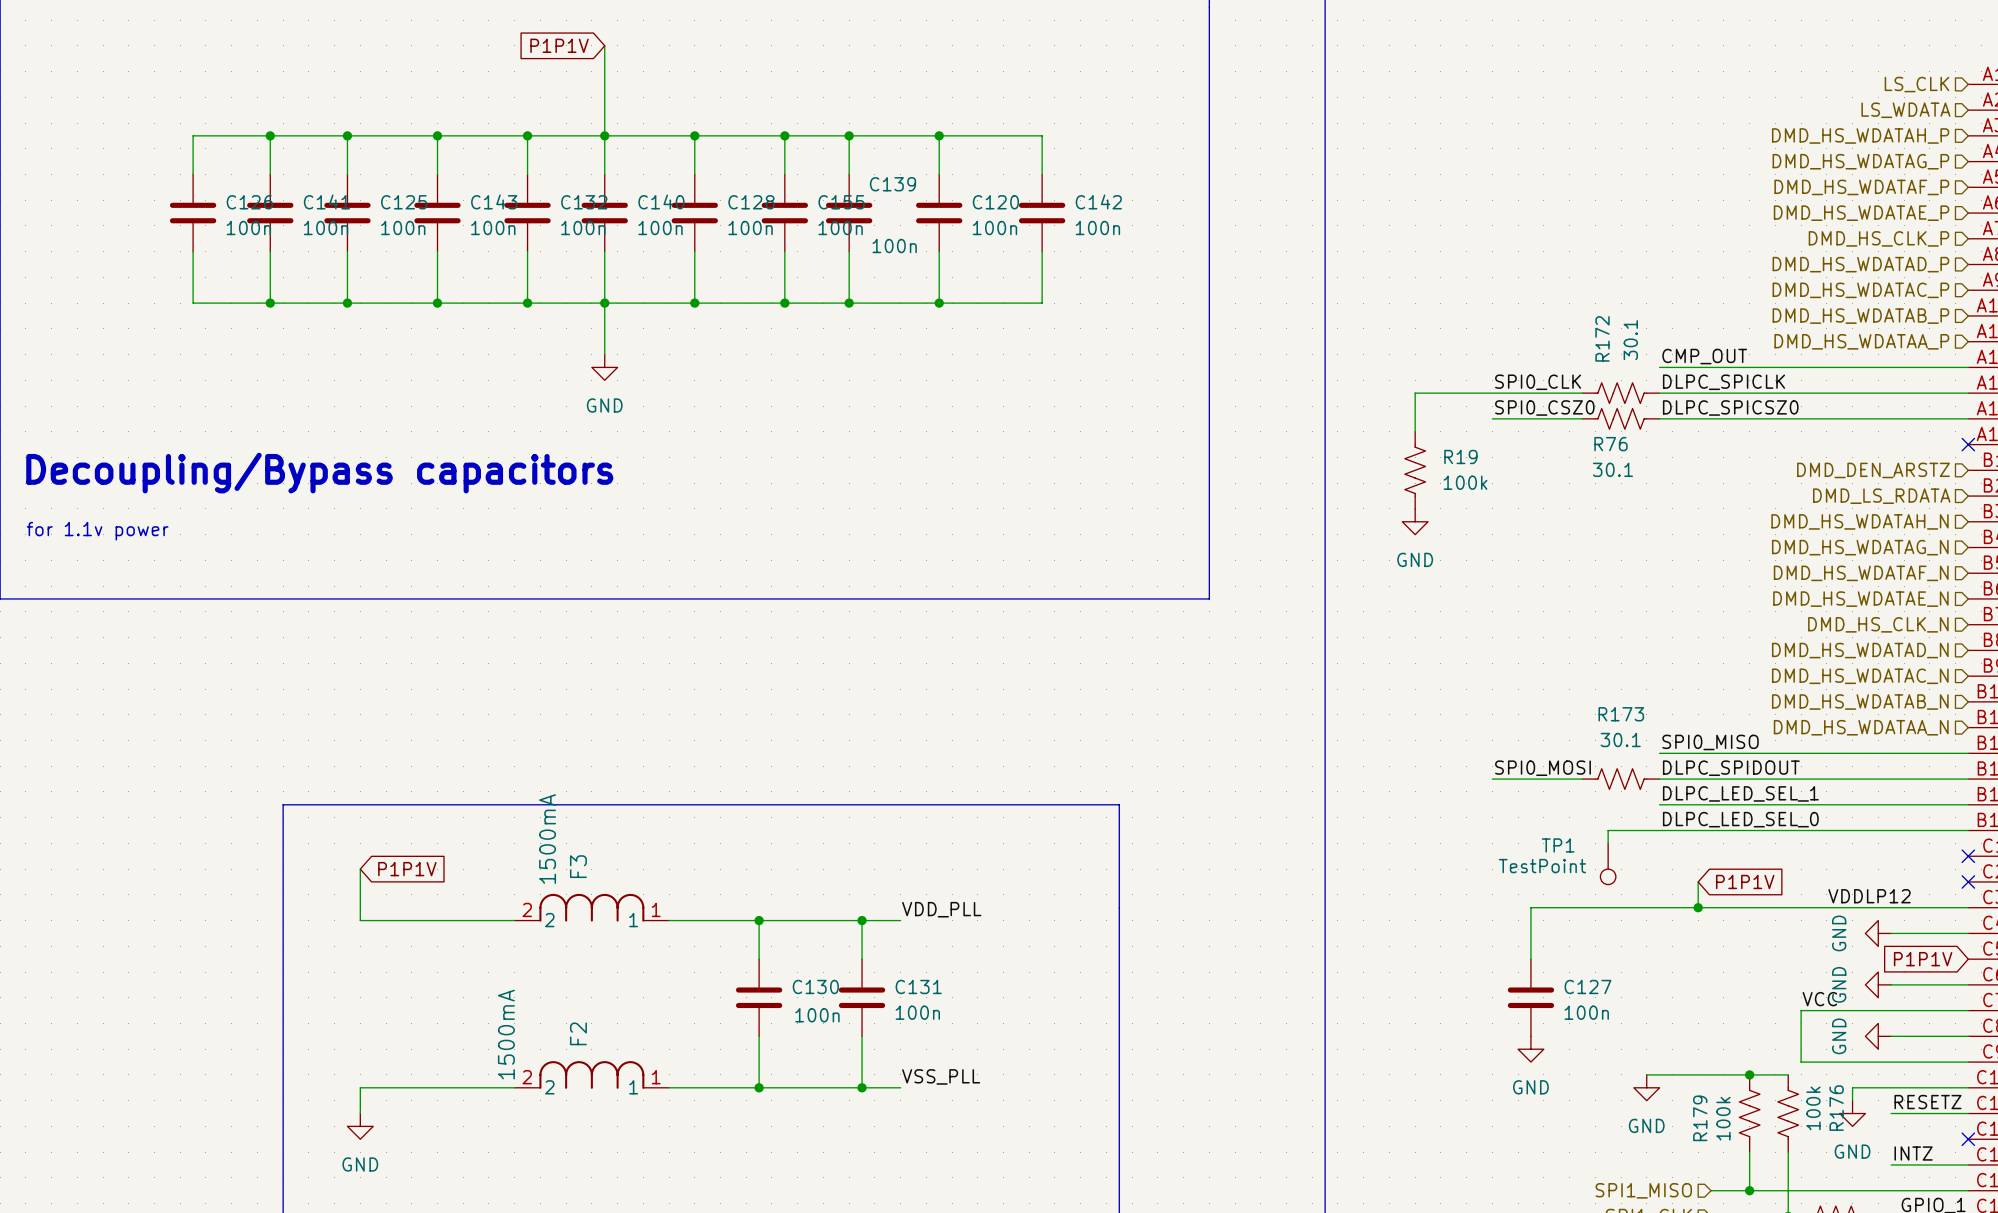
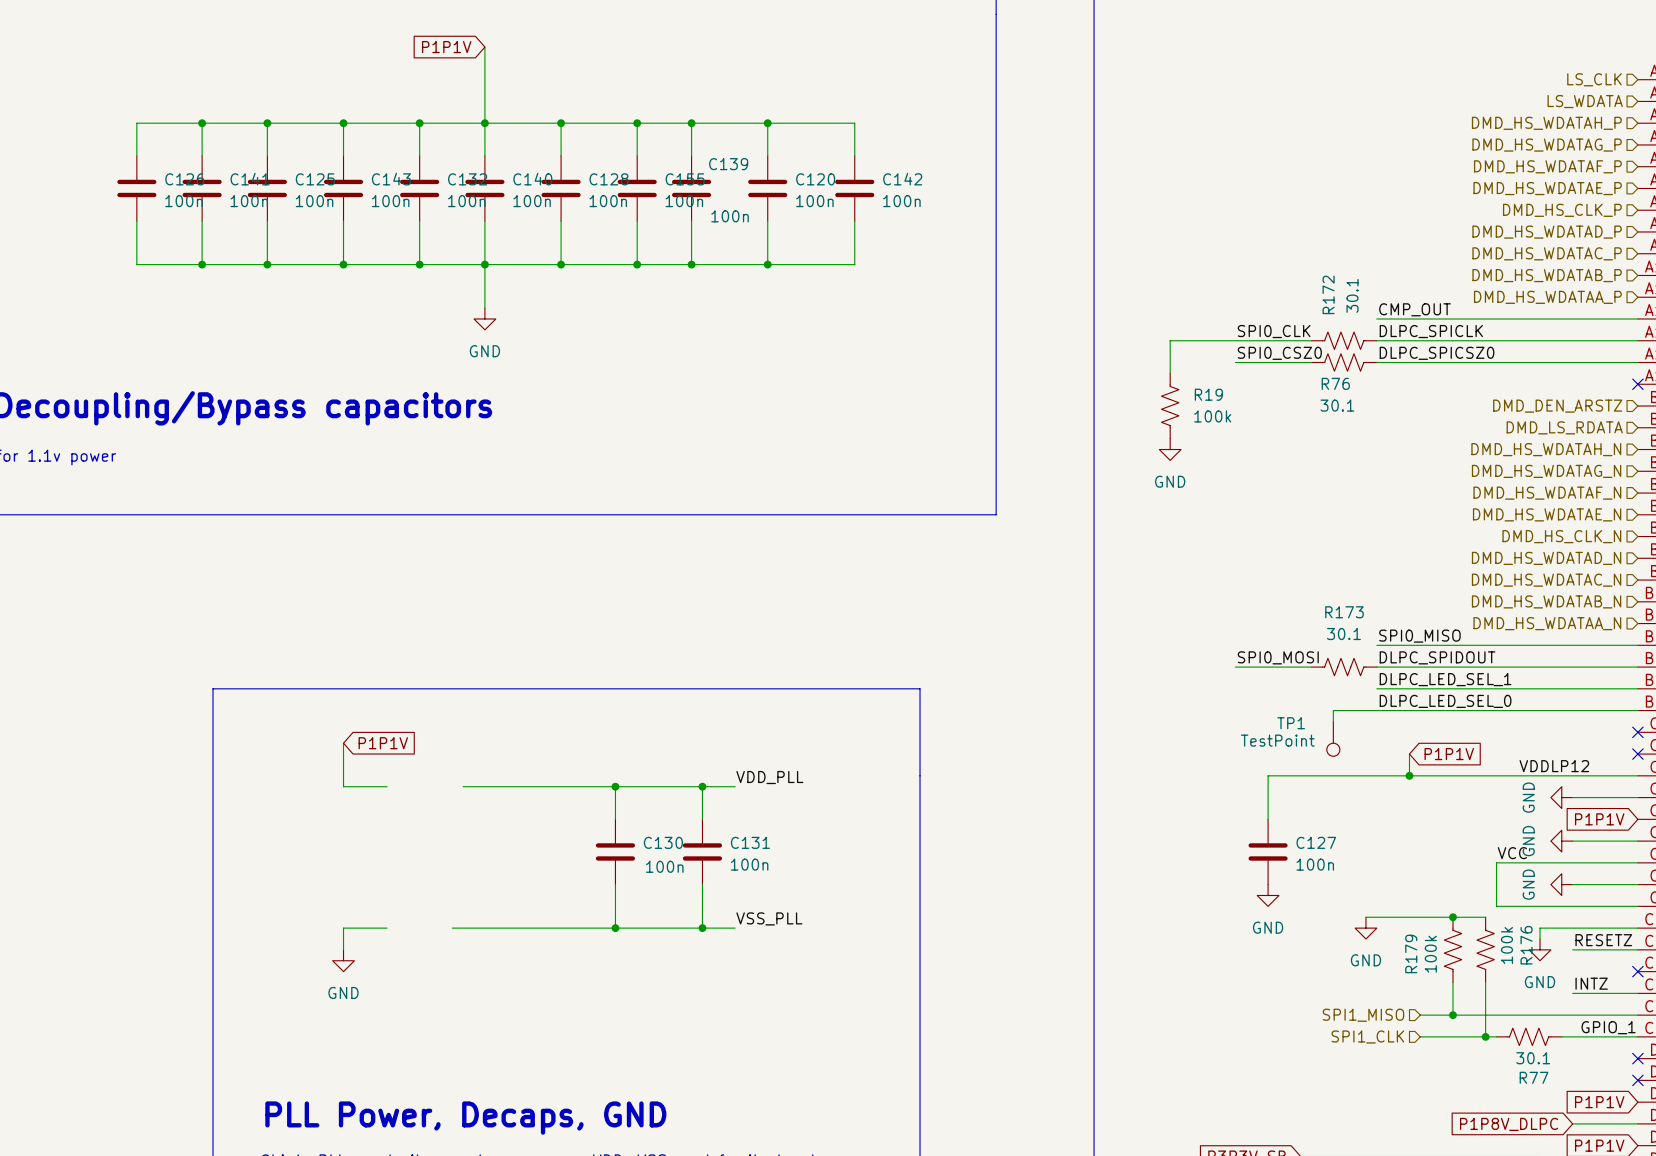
wire: (360, 869) (360, 920) (437, 920) -> (343, 743) (343, 786)
global label position: P1P1V (407, 869) -> P1P1V (383, 743)
F3: 1500mA (591, 907) -> none
wire: (488, 920) (514, 920) -> none
wire: none -> (463, 786) (539, 786)
F2: 1500mA (591, 1074) -> none
wire: (437, 1087) (360, 1087) (360, 1113) -> (343, 928) (343, 949)
wire: (488, 1087) (514, 1087) -> none
wire: none -> (452, 928) (539, 928)
power symbol position: GND (360, 1126) -> GND (343, 960)

